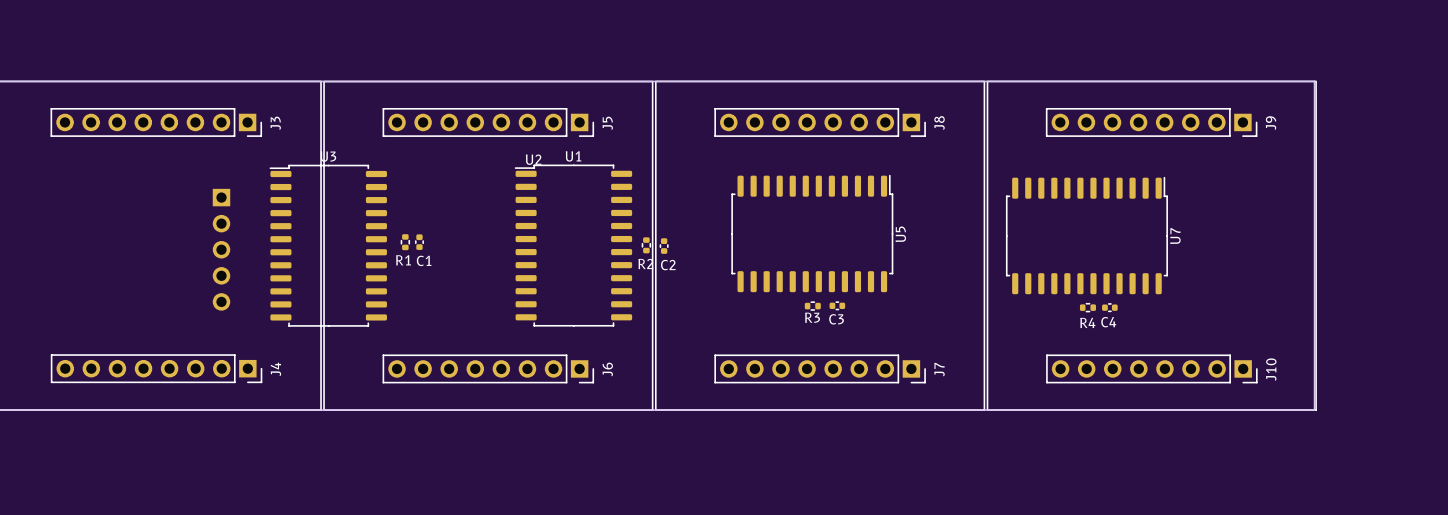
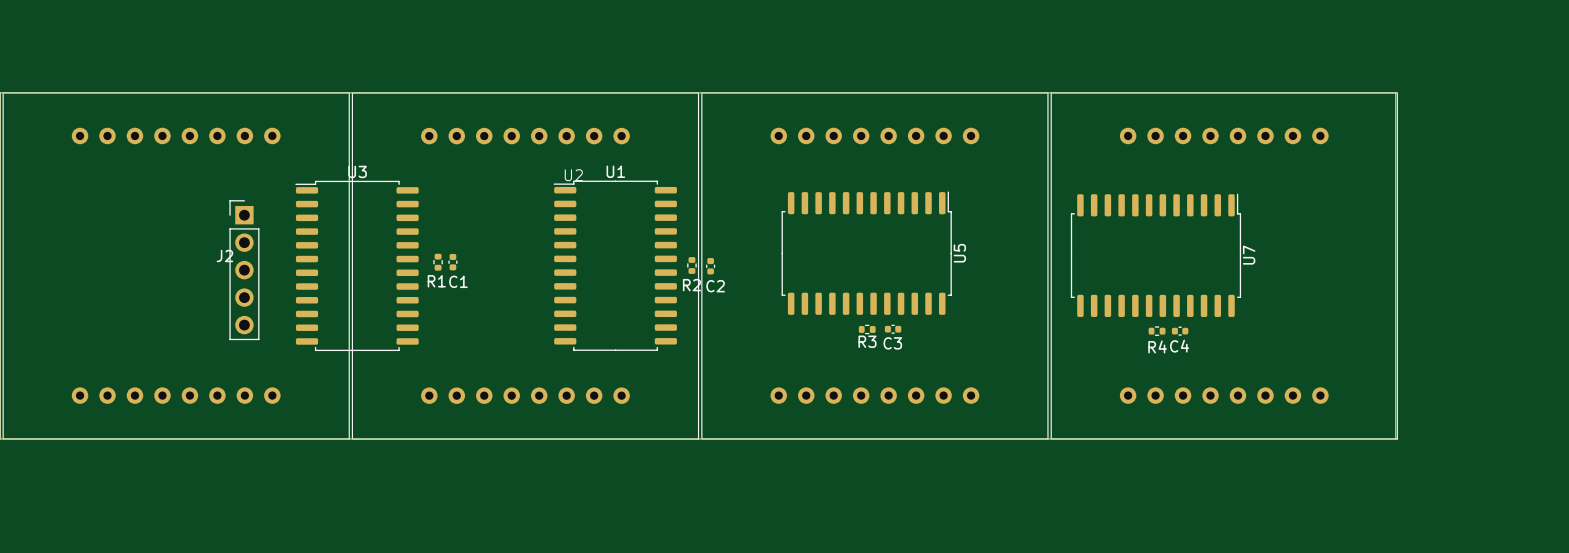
J3: (156, 122) -> none
J5: (488, 122) -> none
J8: (820, 122) -> none
J9: (1151, 122) -> none
J2 side: bottom (221, 249) -> top (244, 270)
J4: (156, 368) -> none
J6: (488, 368) -> none
J7: (820, 368) -> none
J10: (1151, 368) -> none

